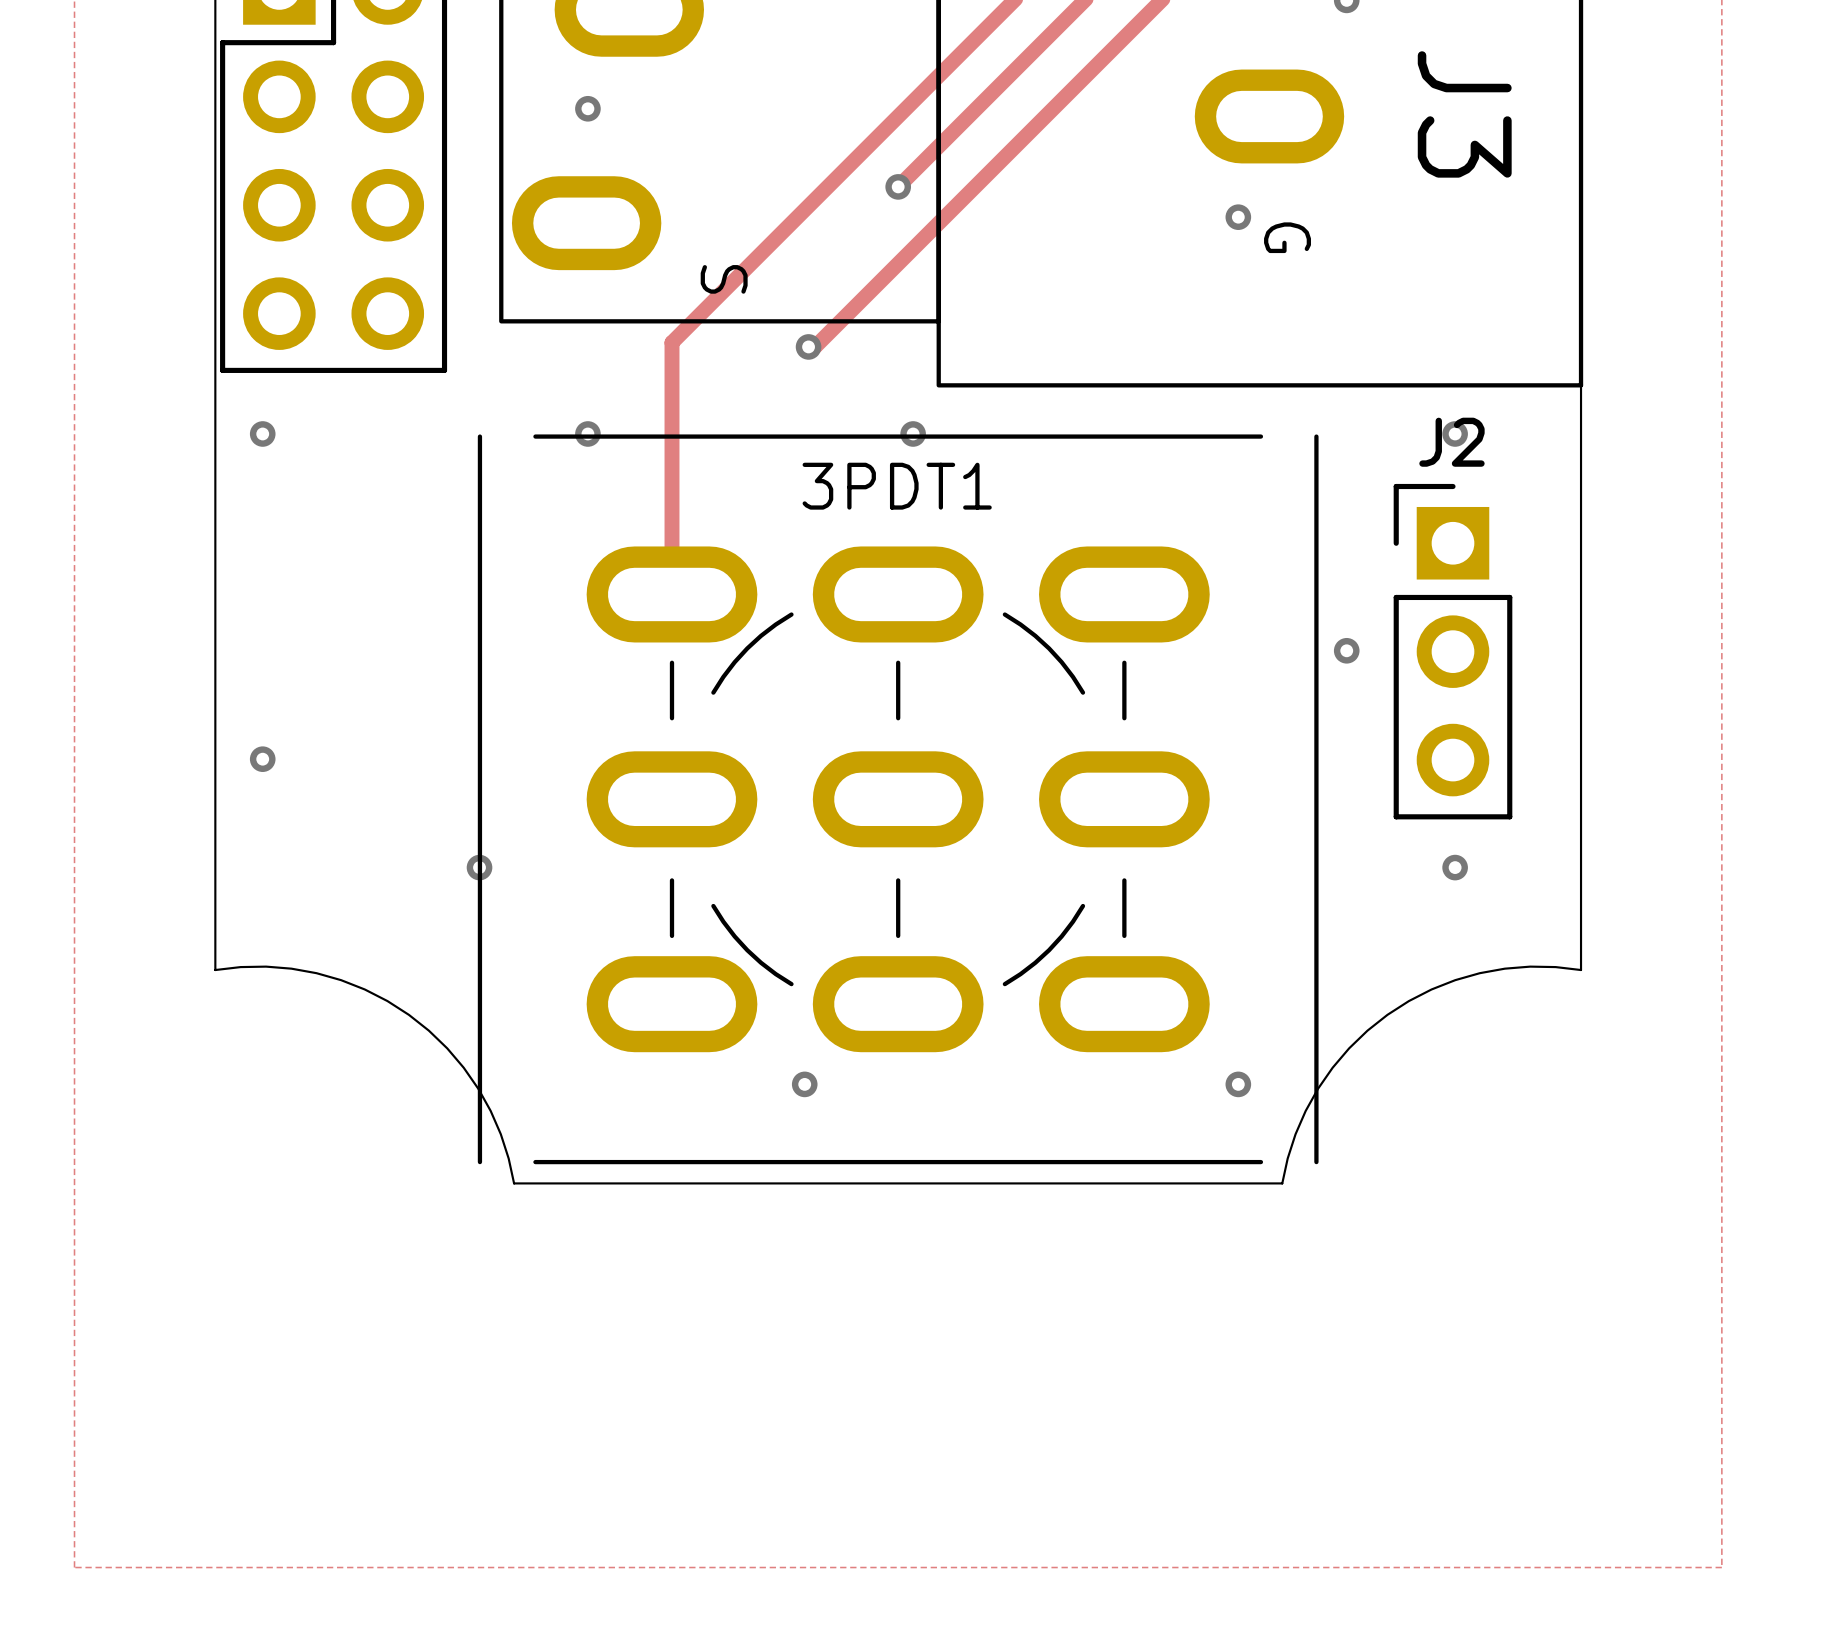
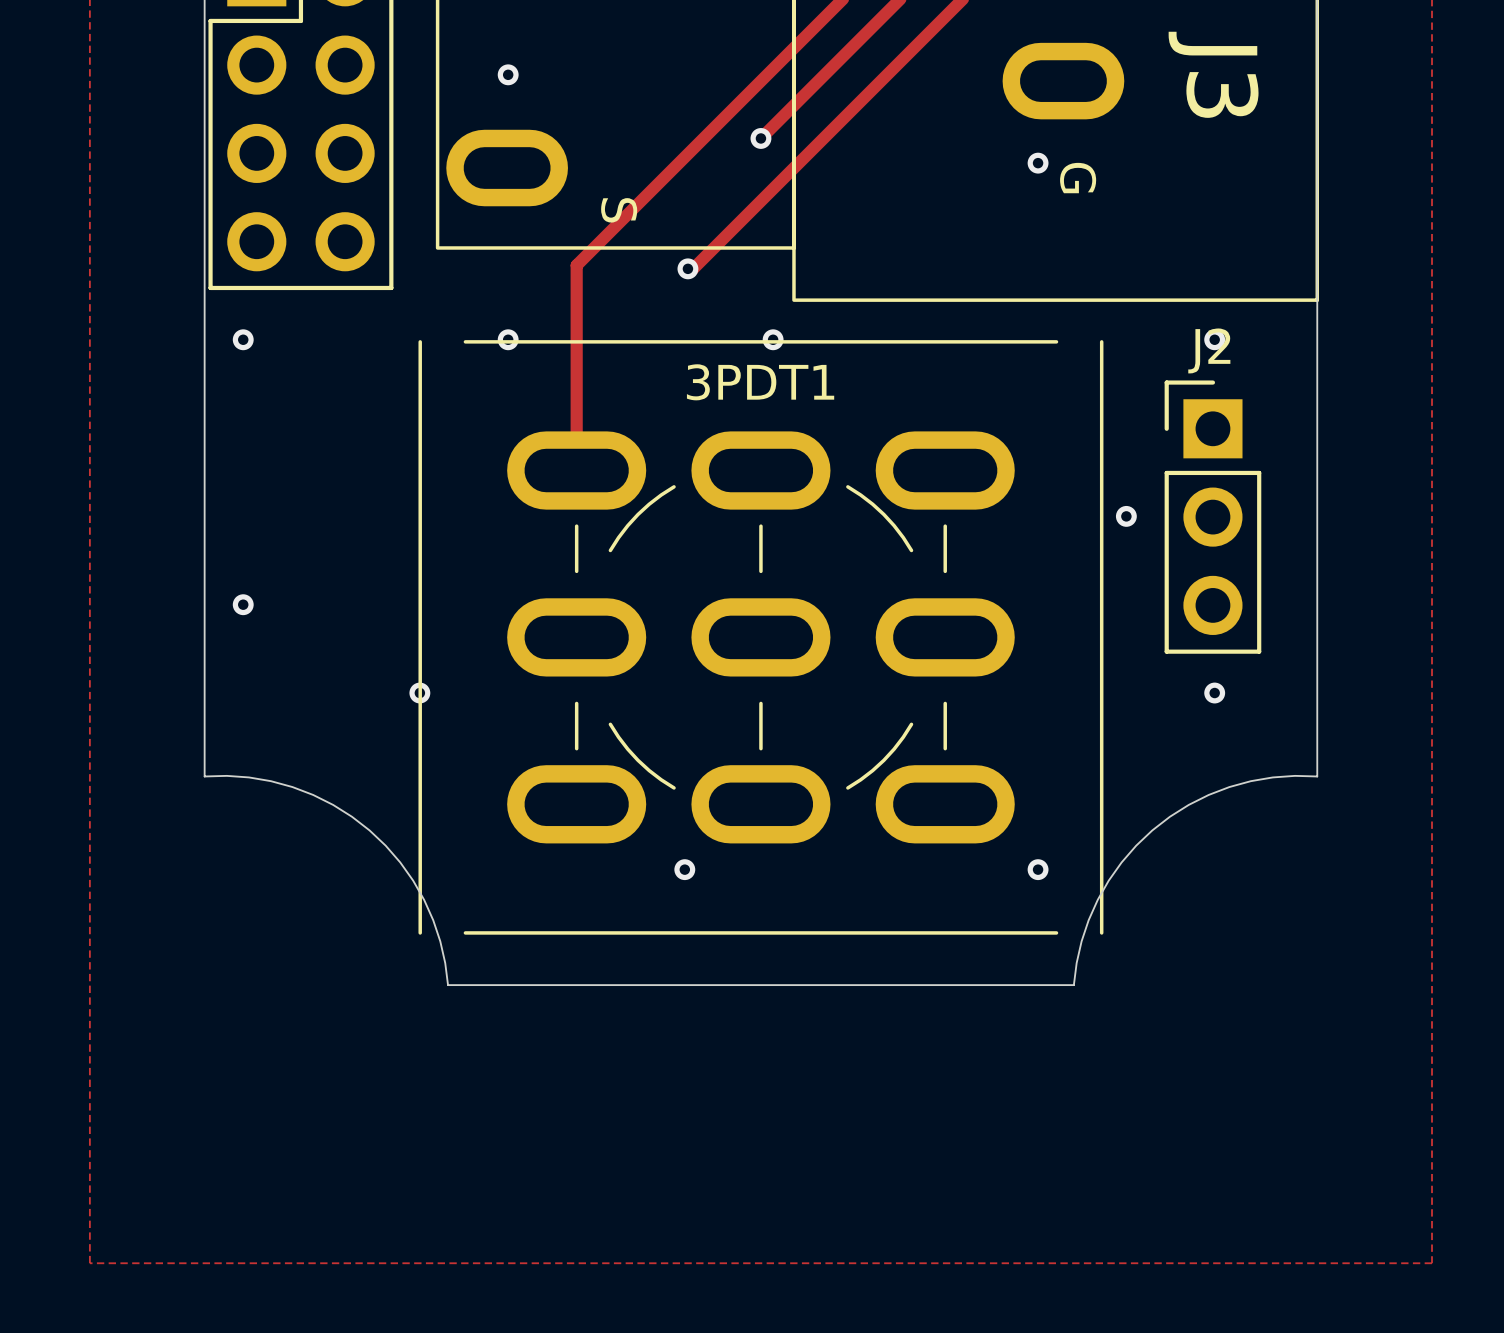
board edge: (215, 970) (266, 966) (316, 973) (364, 989) (408, 1014) (447, 1048) (478, 1088) (500, 1134) (514, 1183) (1282, 1183) (1295, 1134) (1318, 1088) (1349, 1048) (1387, 1014) (1431, 989) (1479, 973) (1530, 966) (1581, 970) -> (204, 776) (249, 777) (292, 787) (333, 804) (369, 830) (400, 862) (424, 899) (440, 941) (448, 985) (1073, 985) (1081, 941) (1097, 899) (1121, 862) (1152, 830) (1188, 804) (1229, 787) (1272, 777) (1317, 776)

